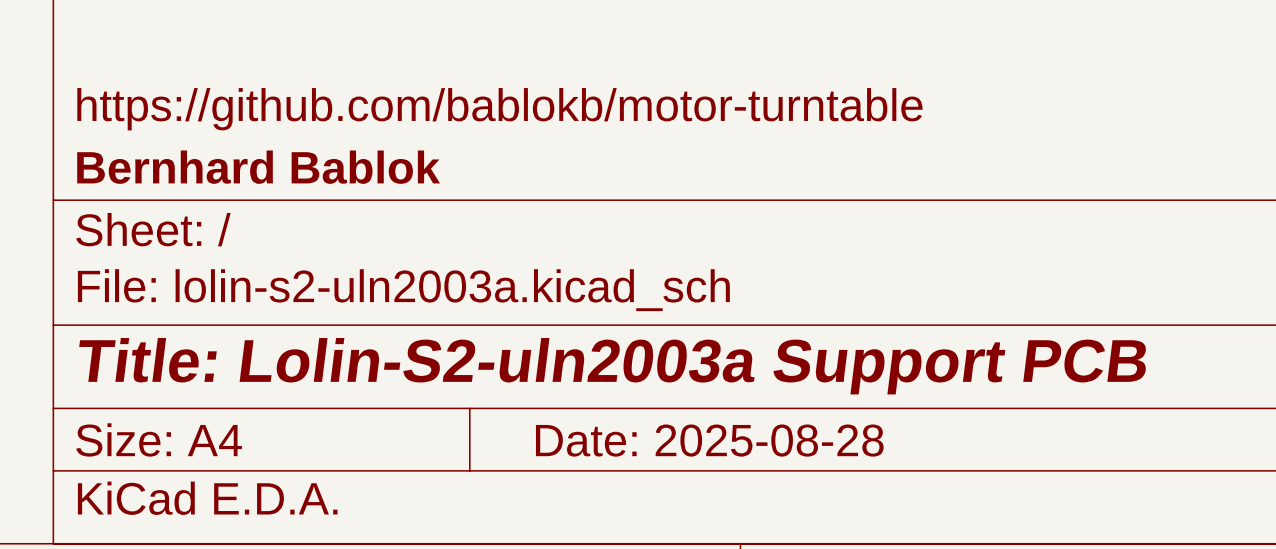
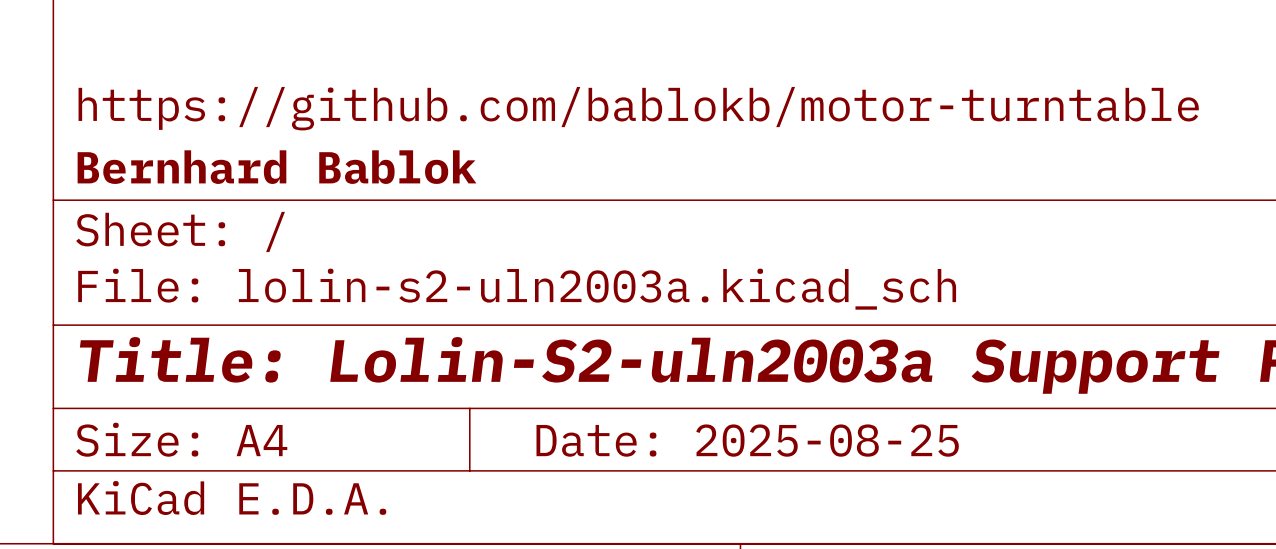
title block: Date: 2025-08-28 (709, 440) -> Date: 2025-08-25 (747, 440)

